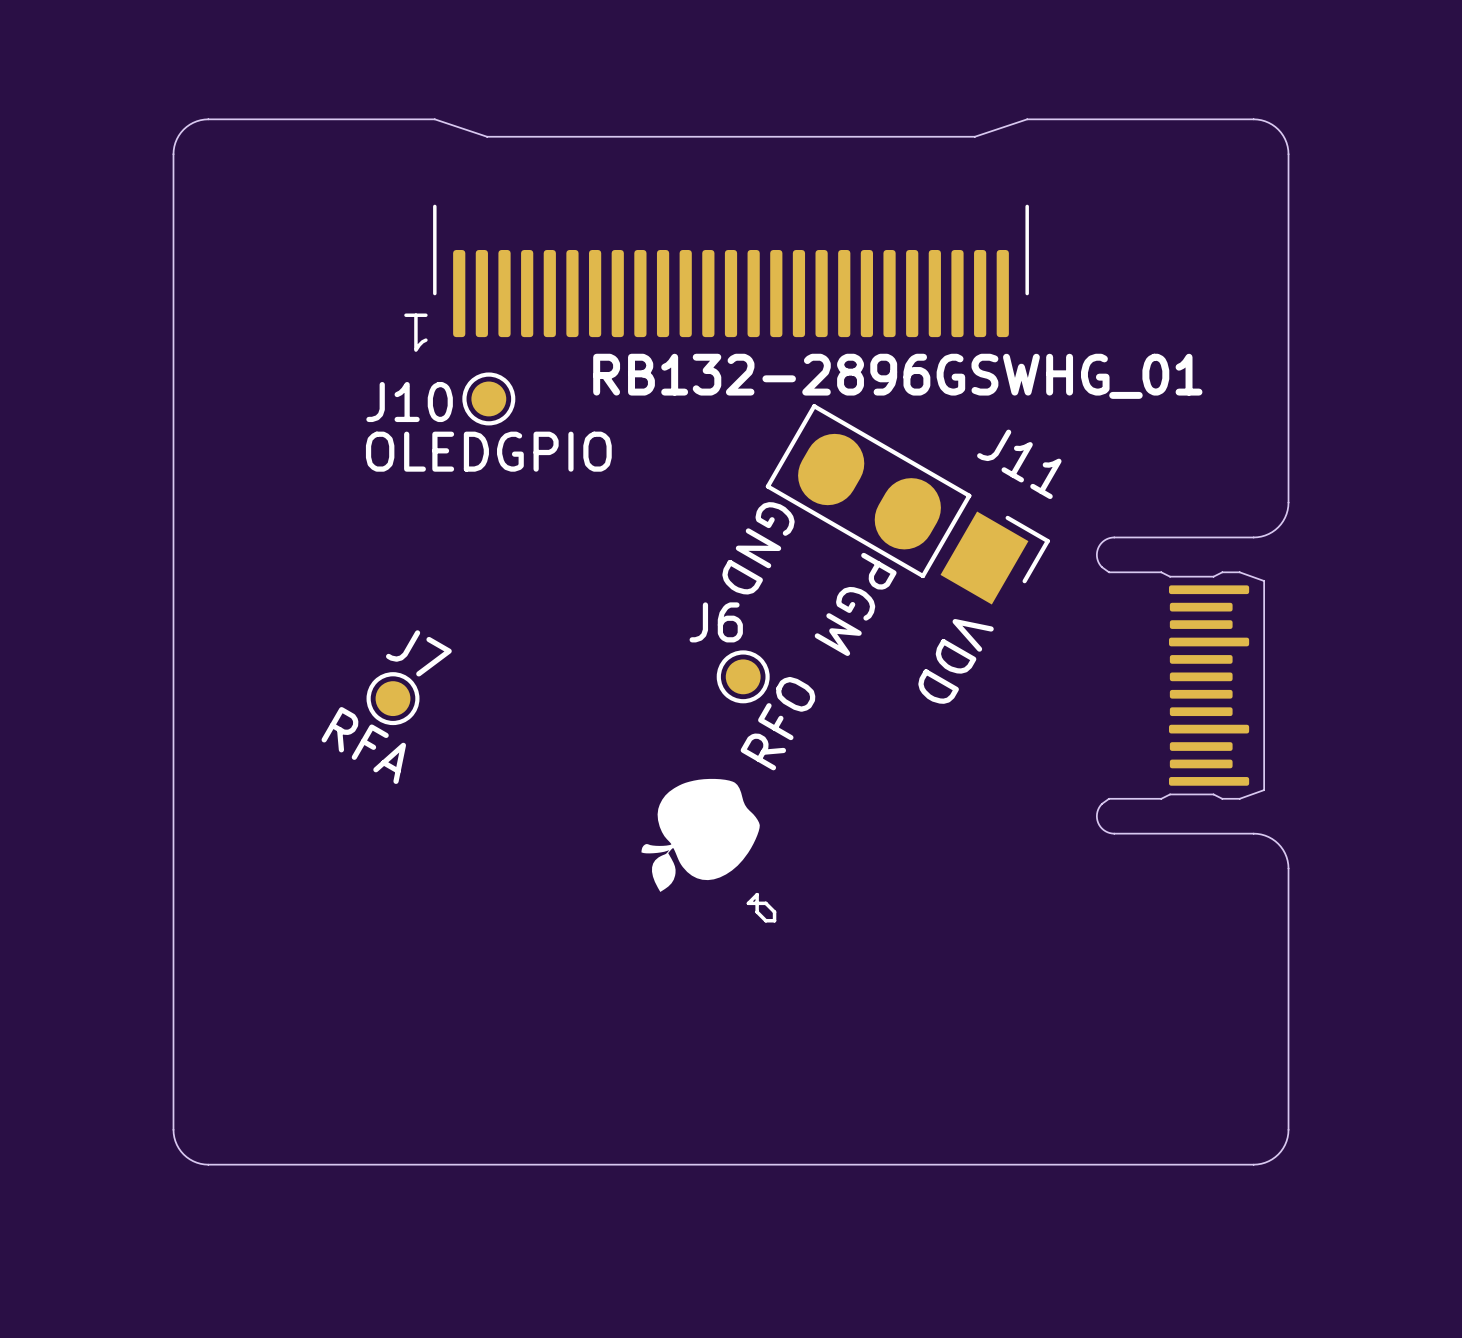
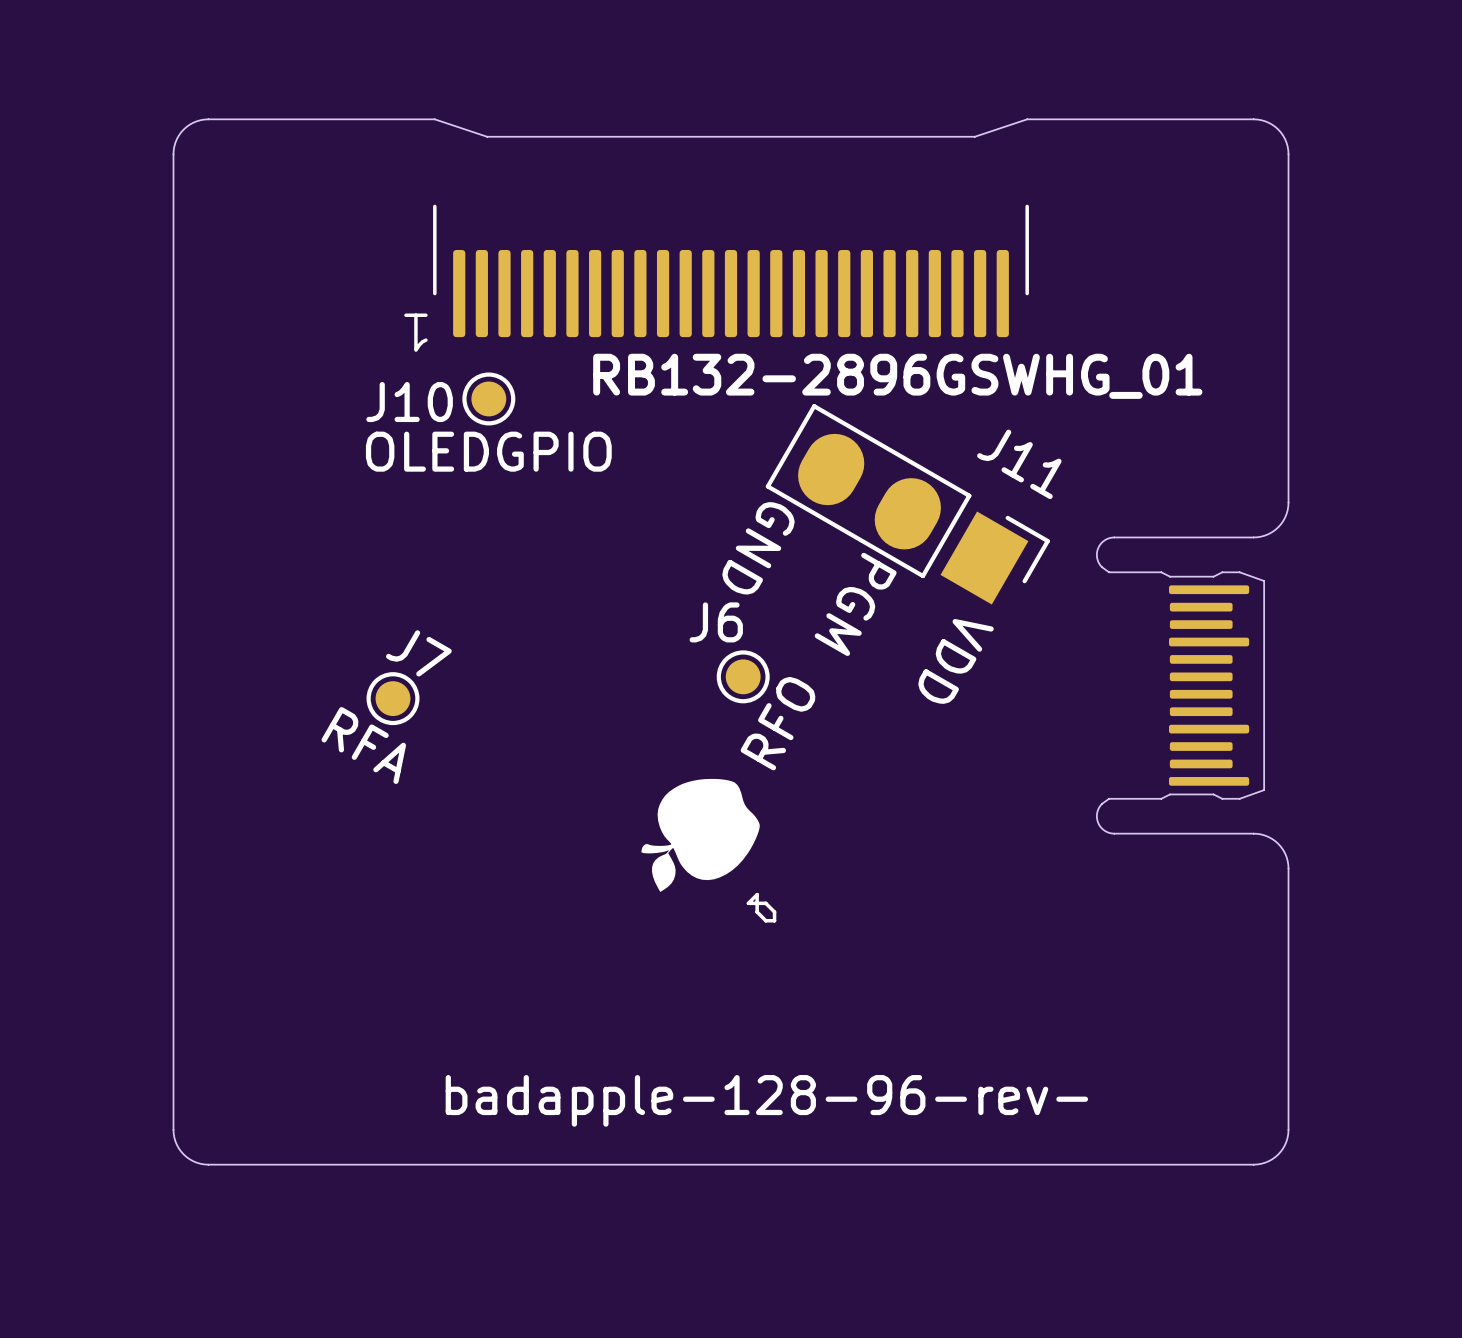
text: none -> badapple-128-96-rev- (766, 1100)

